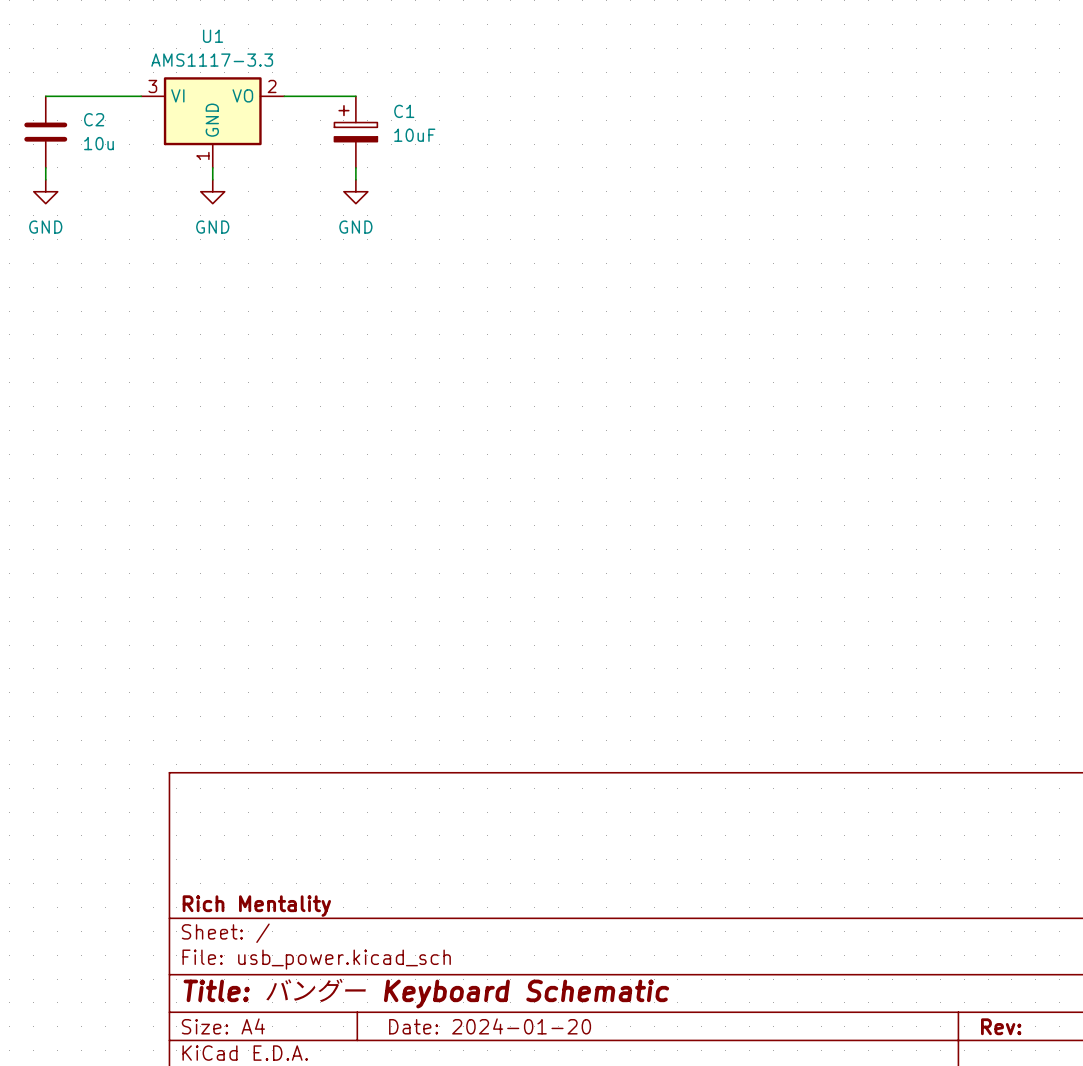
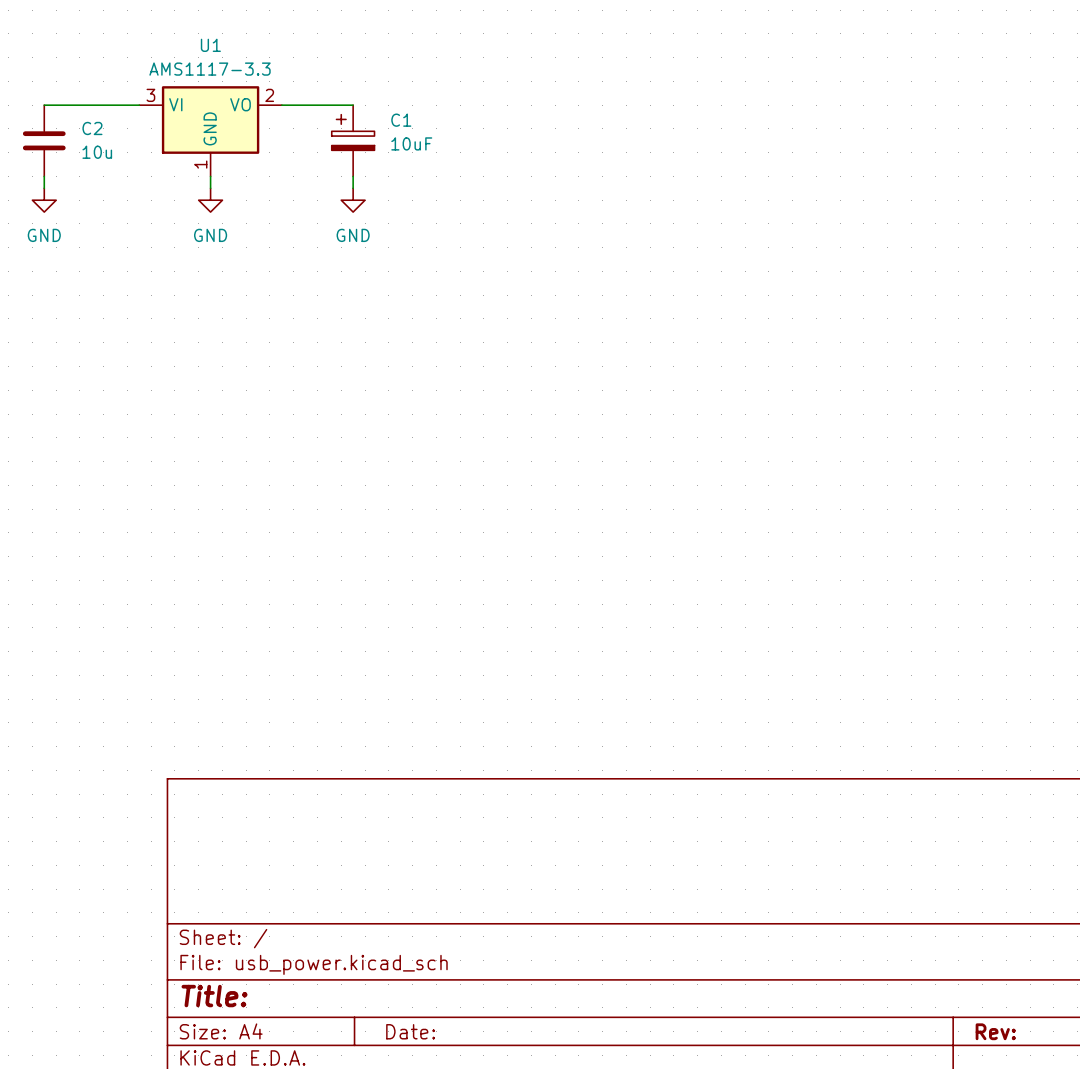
title block: Rich Mentality (256, 906) -> none
title block: Title: バングー Keyboard Schematic (426, 992) -> Title: (214, 996)
title block: Date: 2024-01-20 (490, 1026) -> Date: (410, 1031)

